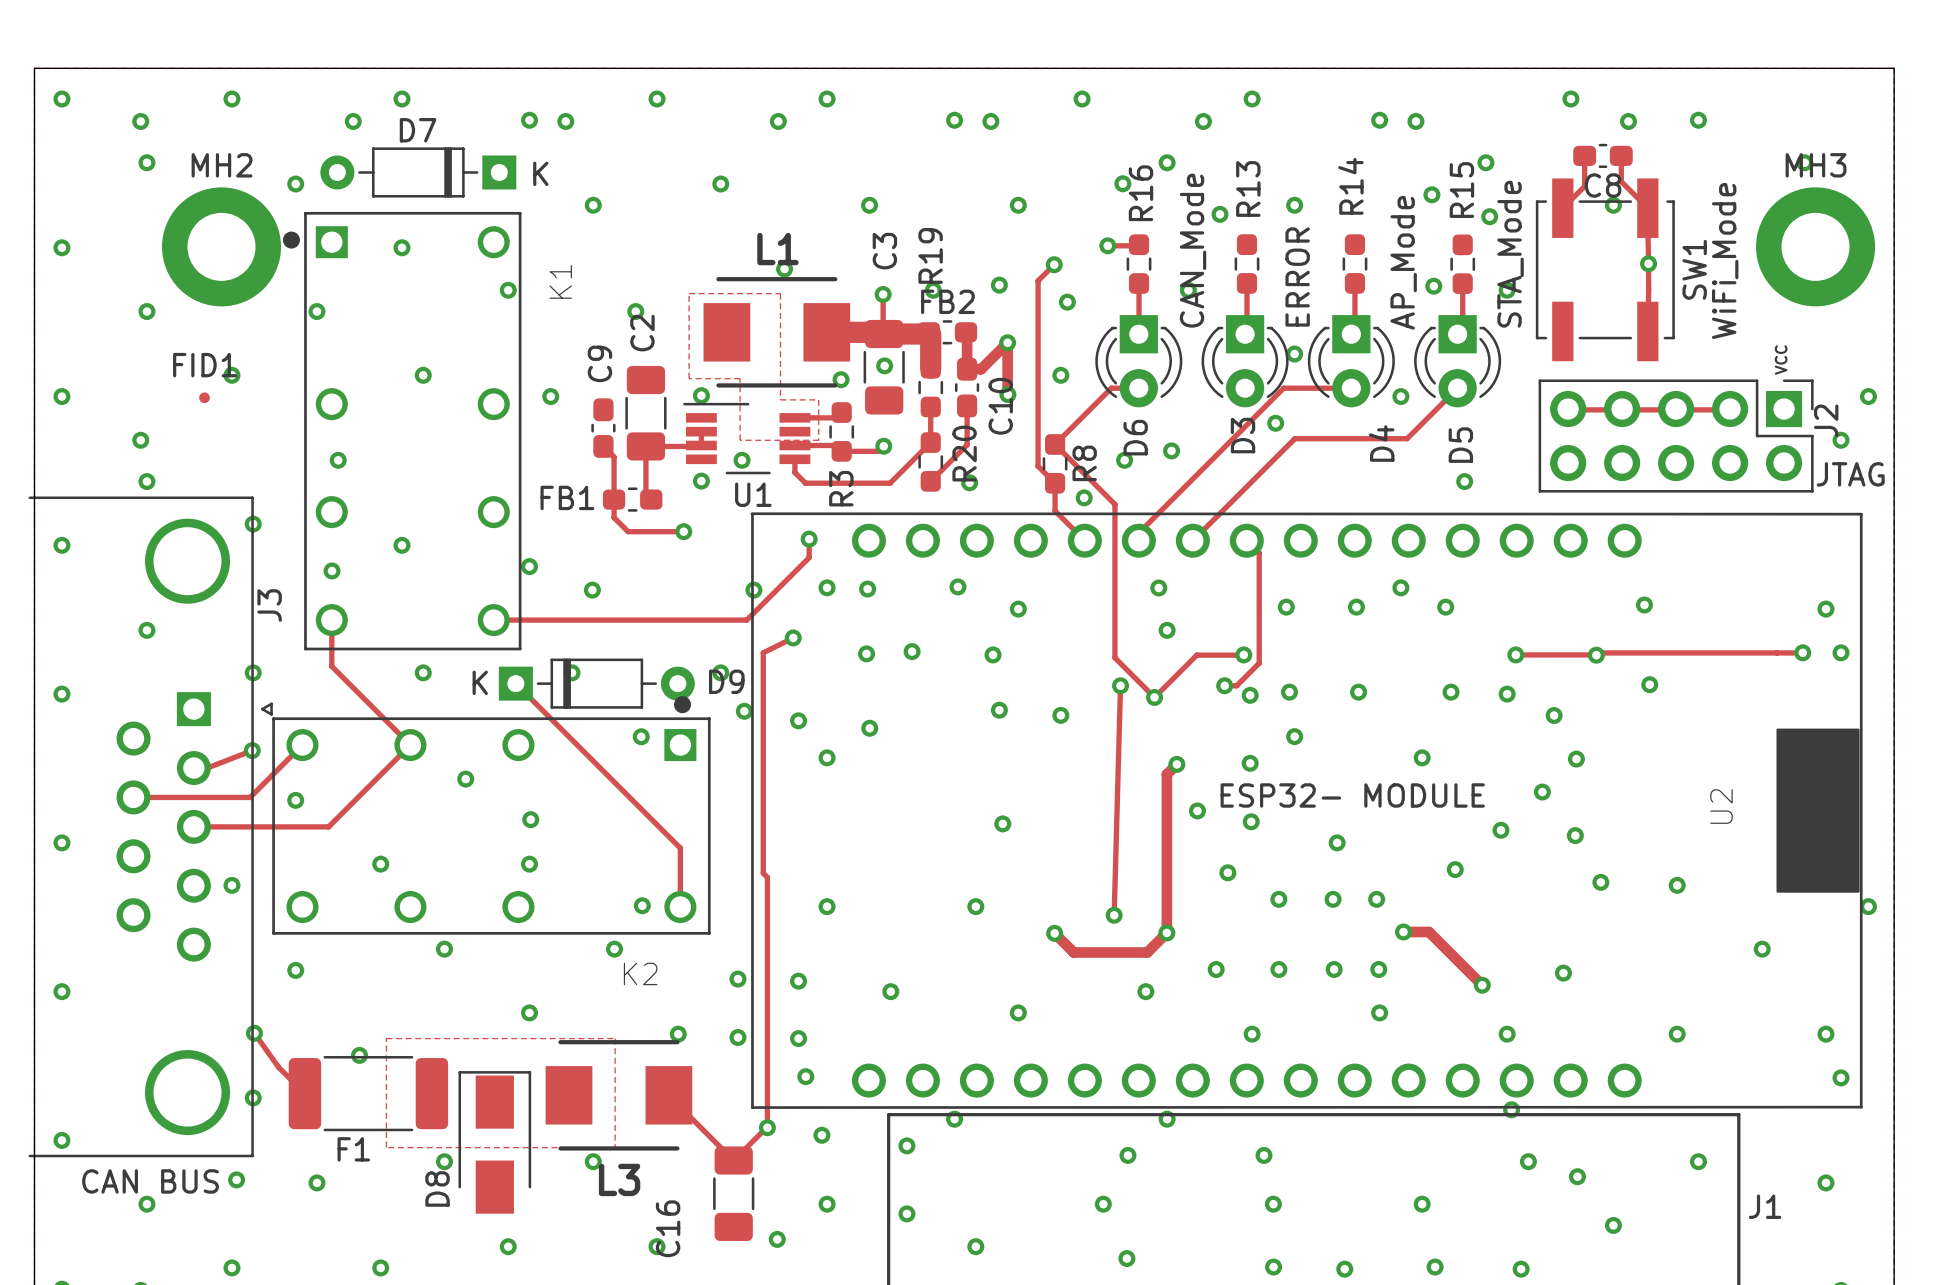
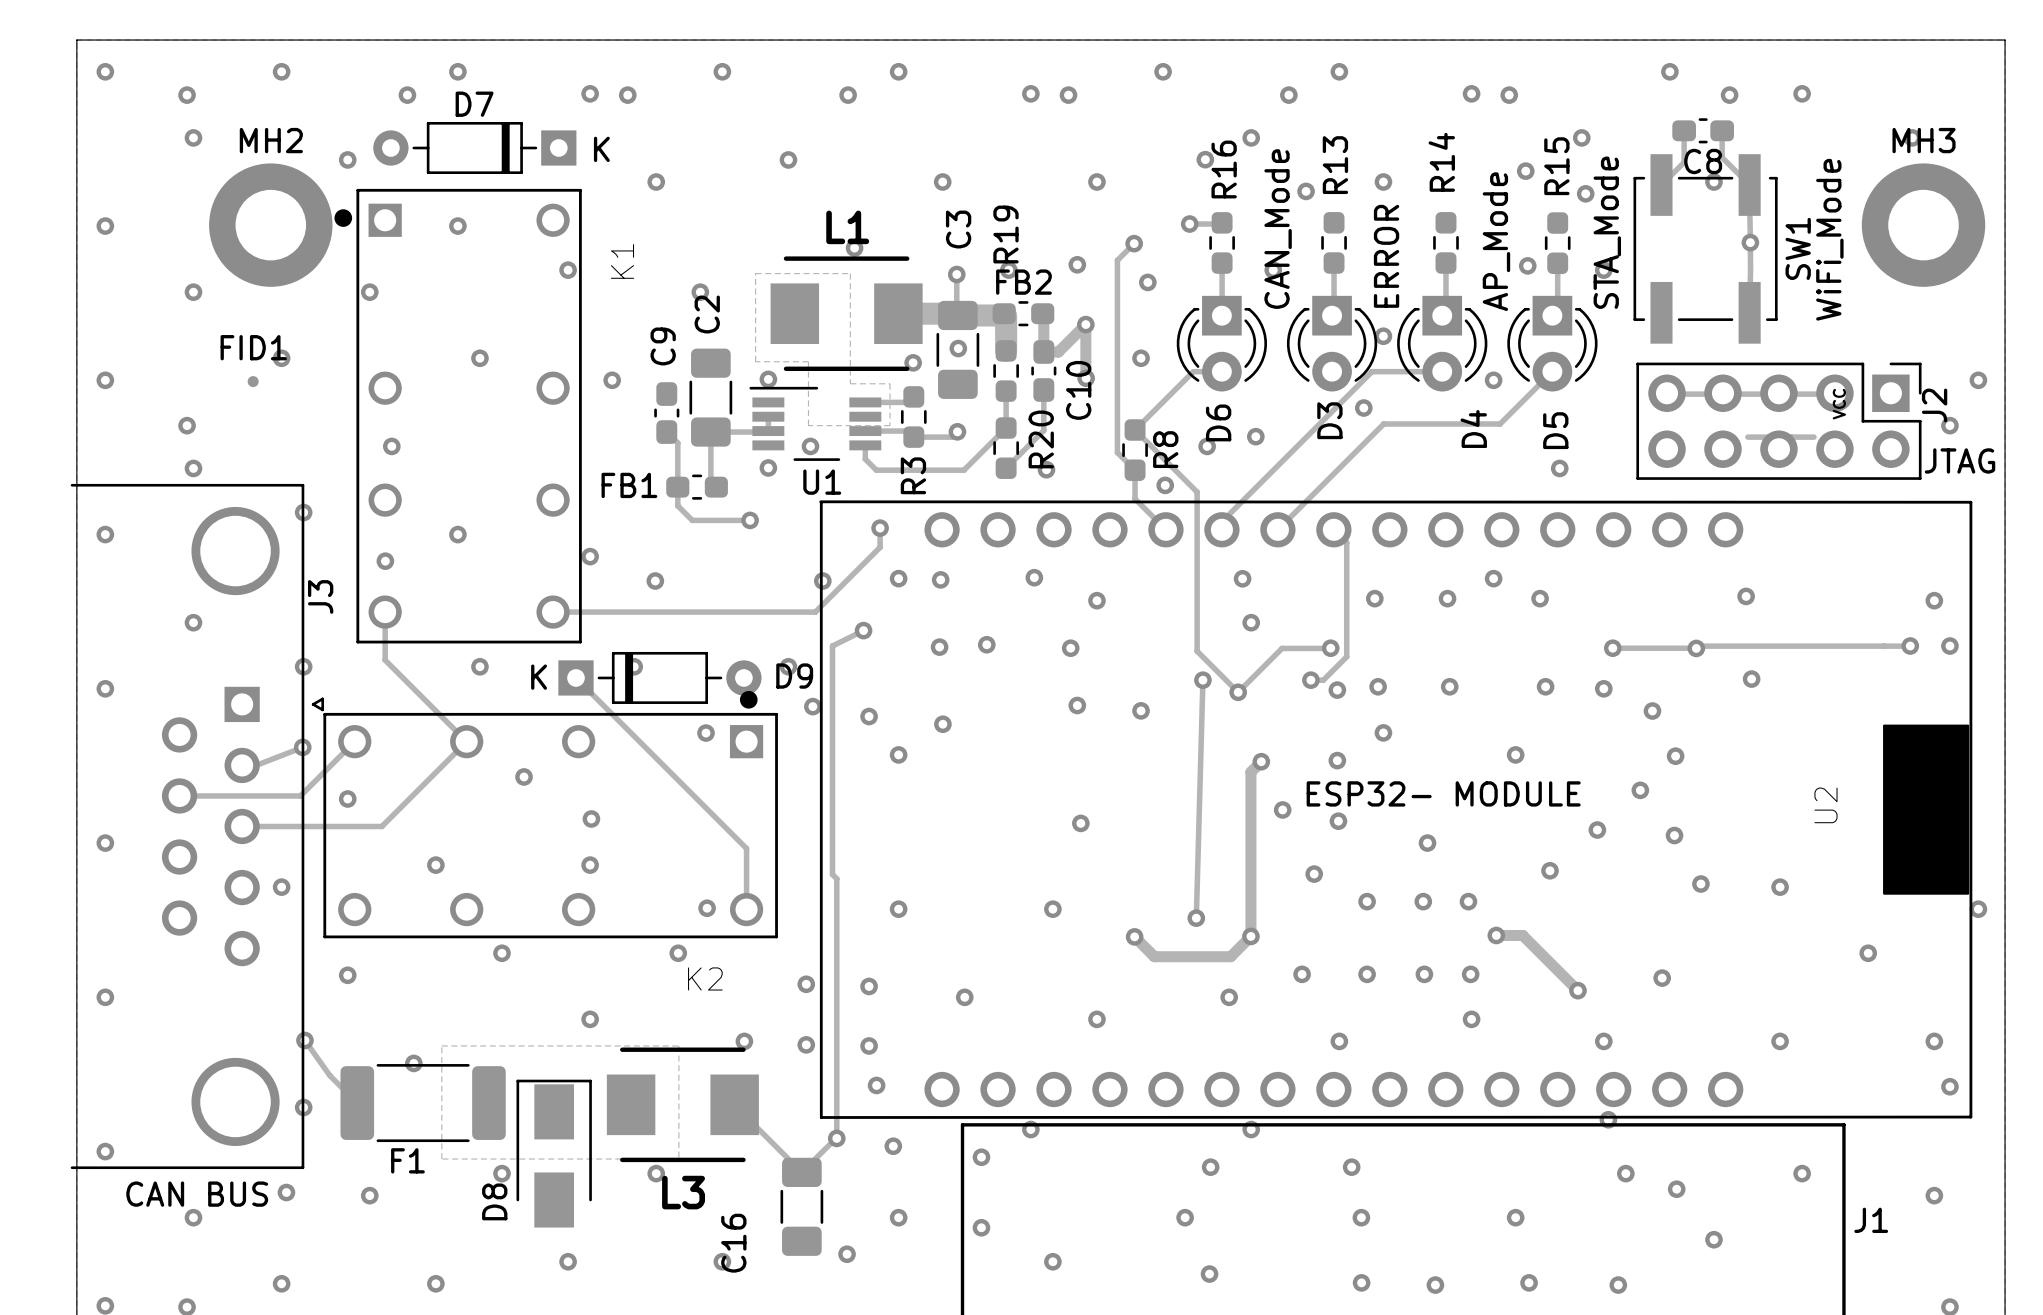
text position: VCC (1781, 360) -> VCC (1839, 404)
track: none -> (1747, 437) (1813, 437)

